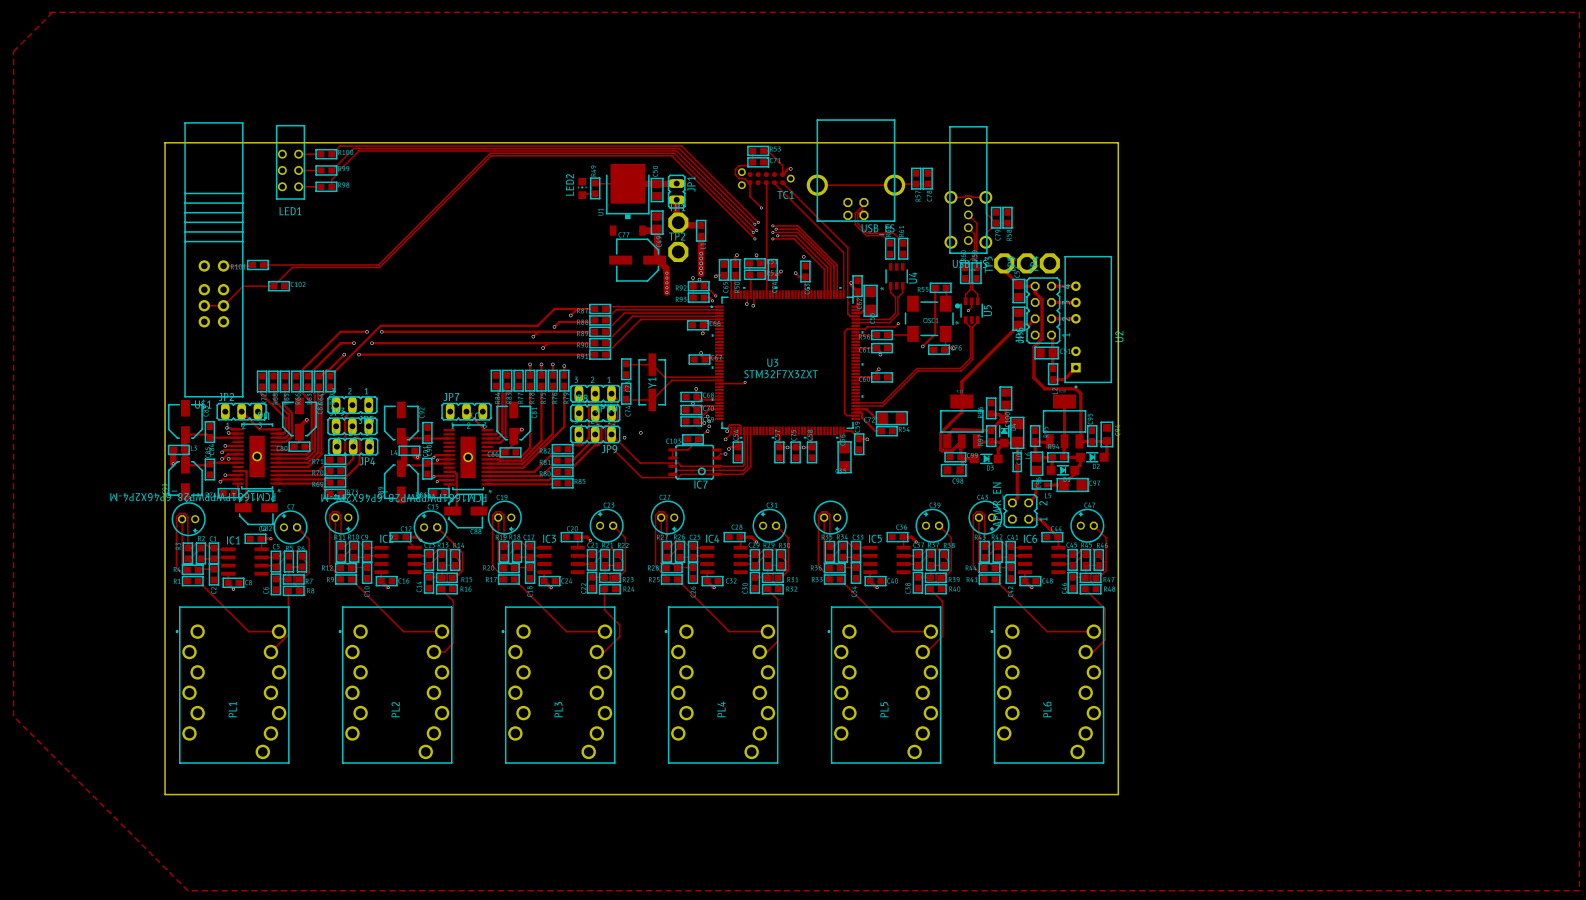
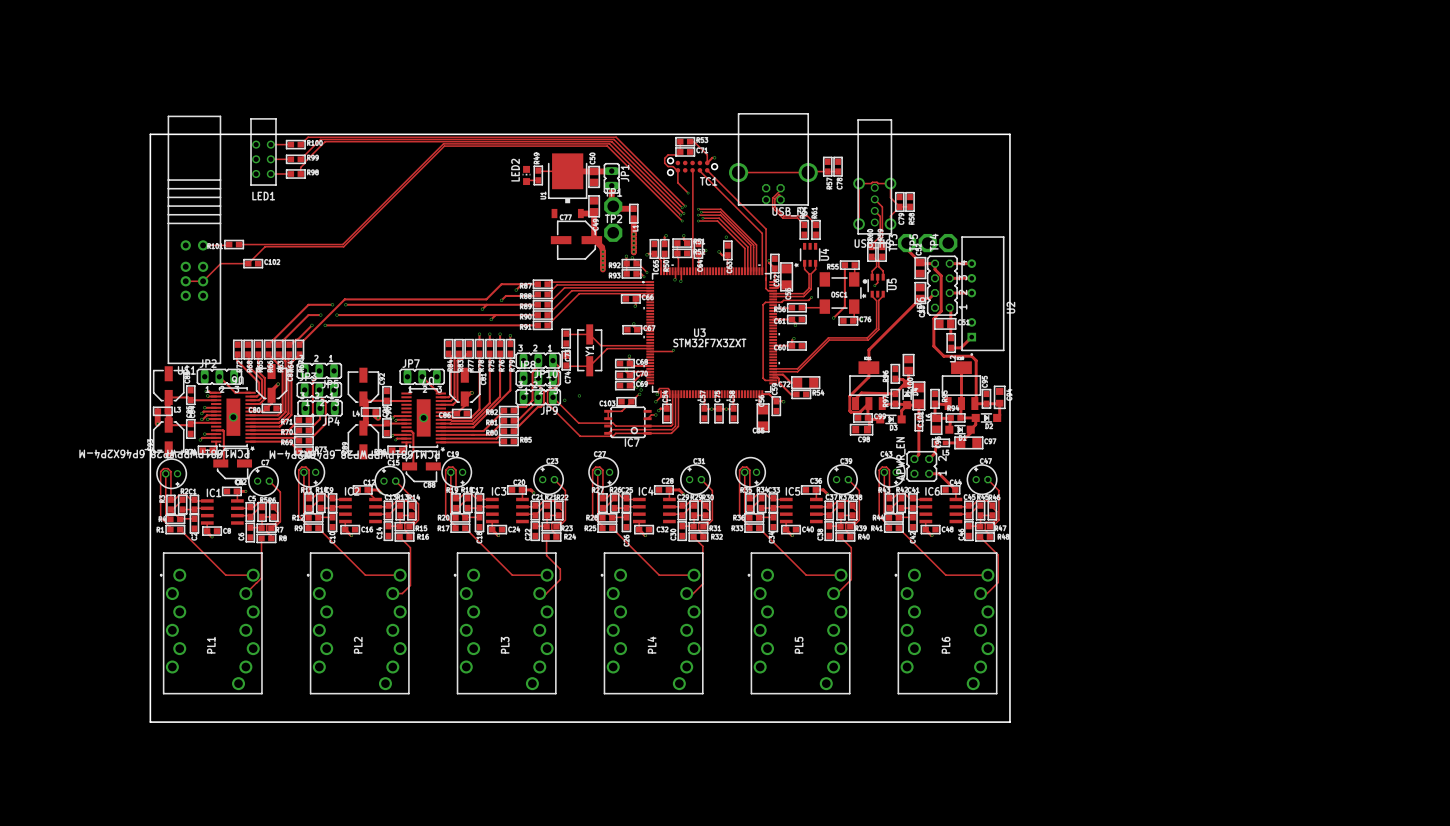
zone outline: (49, 12) (1579, 12) (1579, 890) (187, 890) (13, 716) (13, 51) (50, 14) (49, 12) -> none

